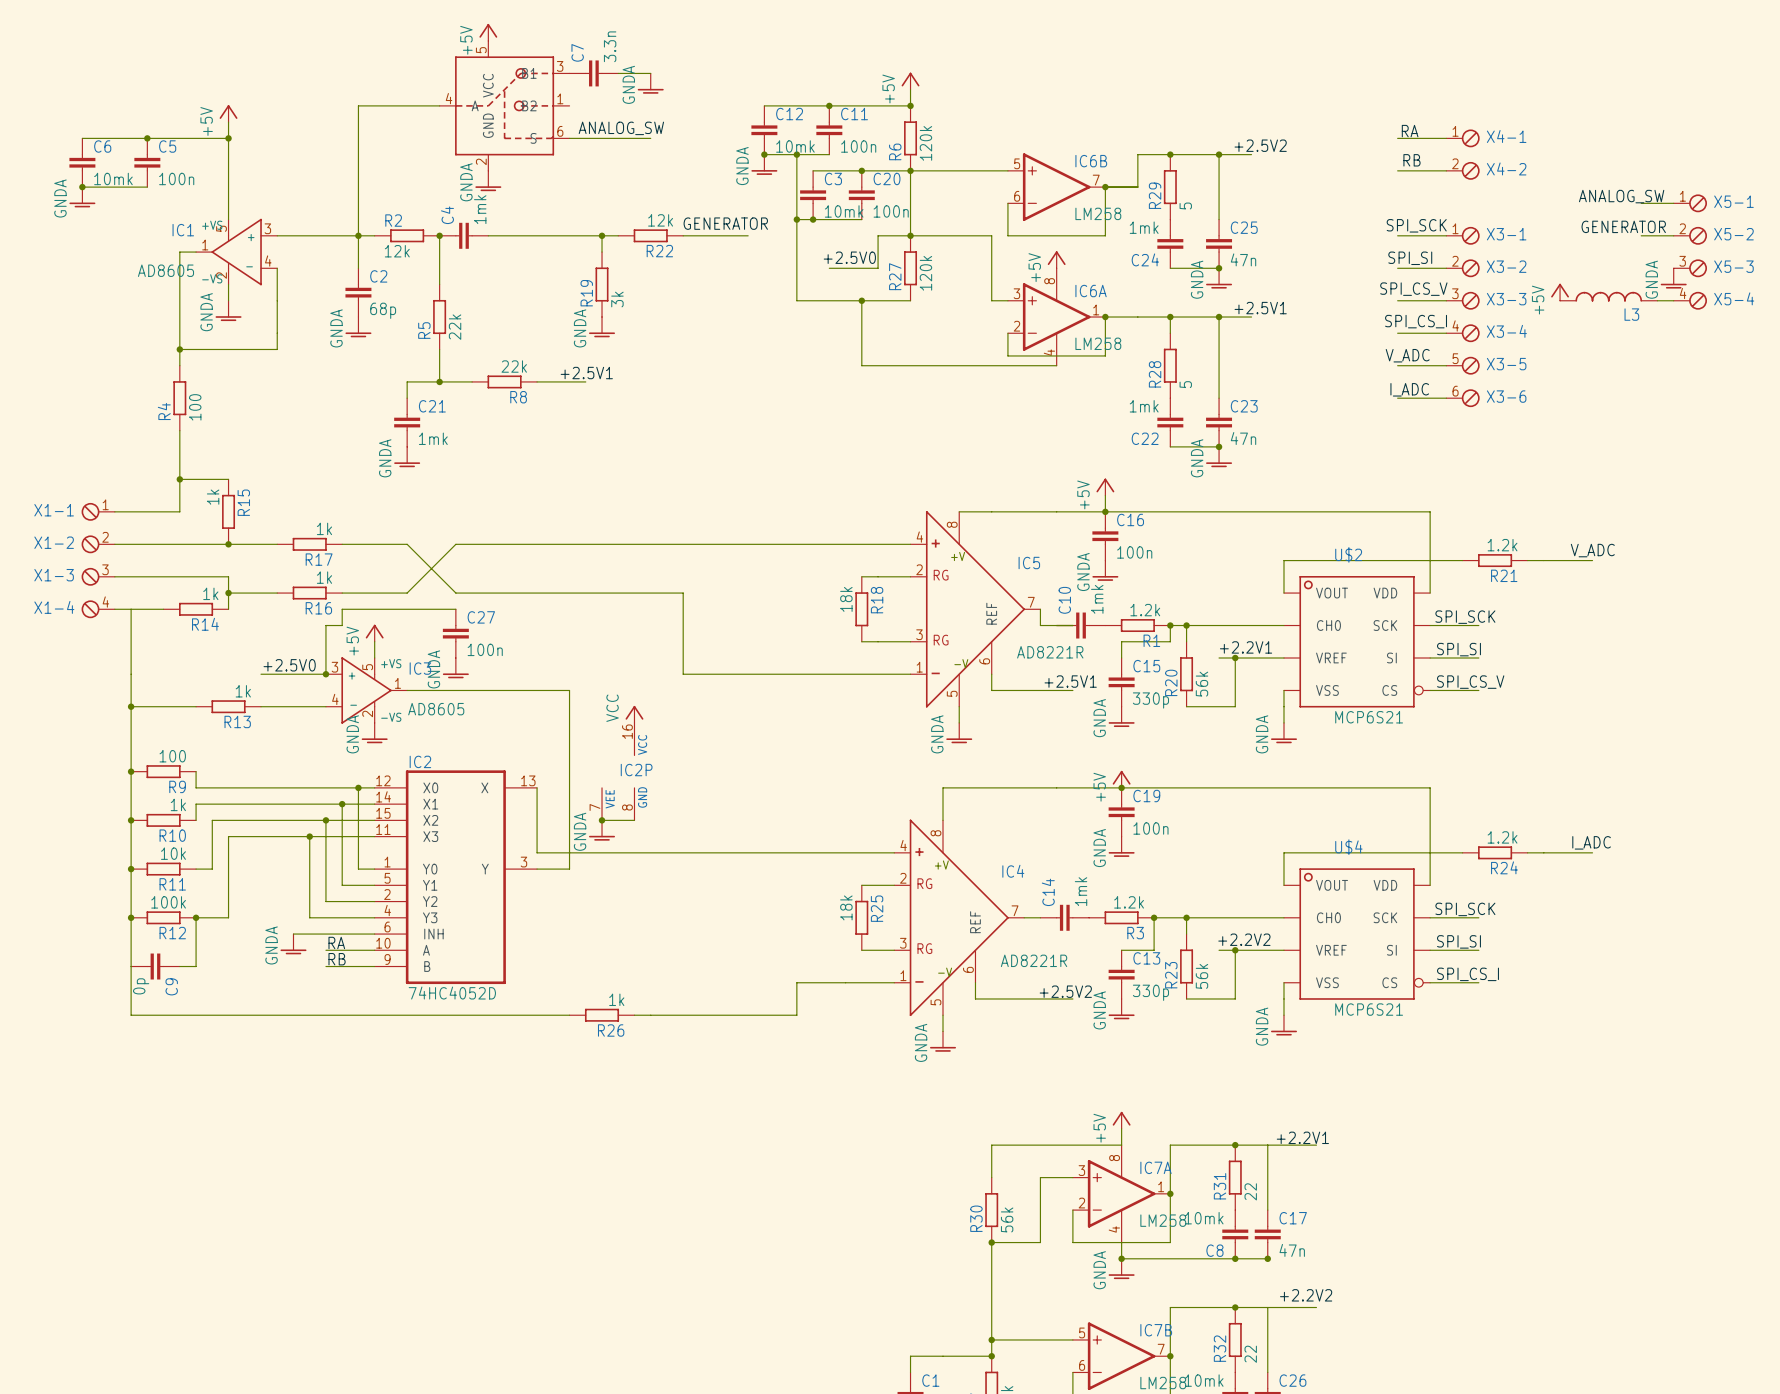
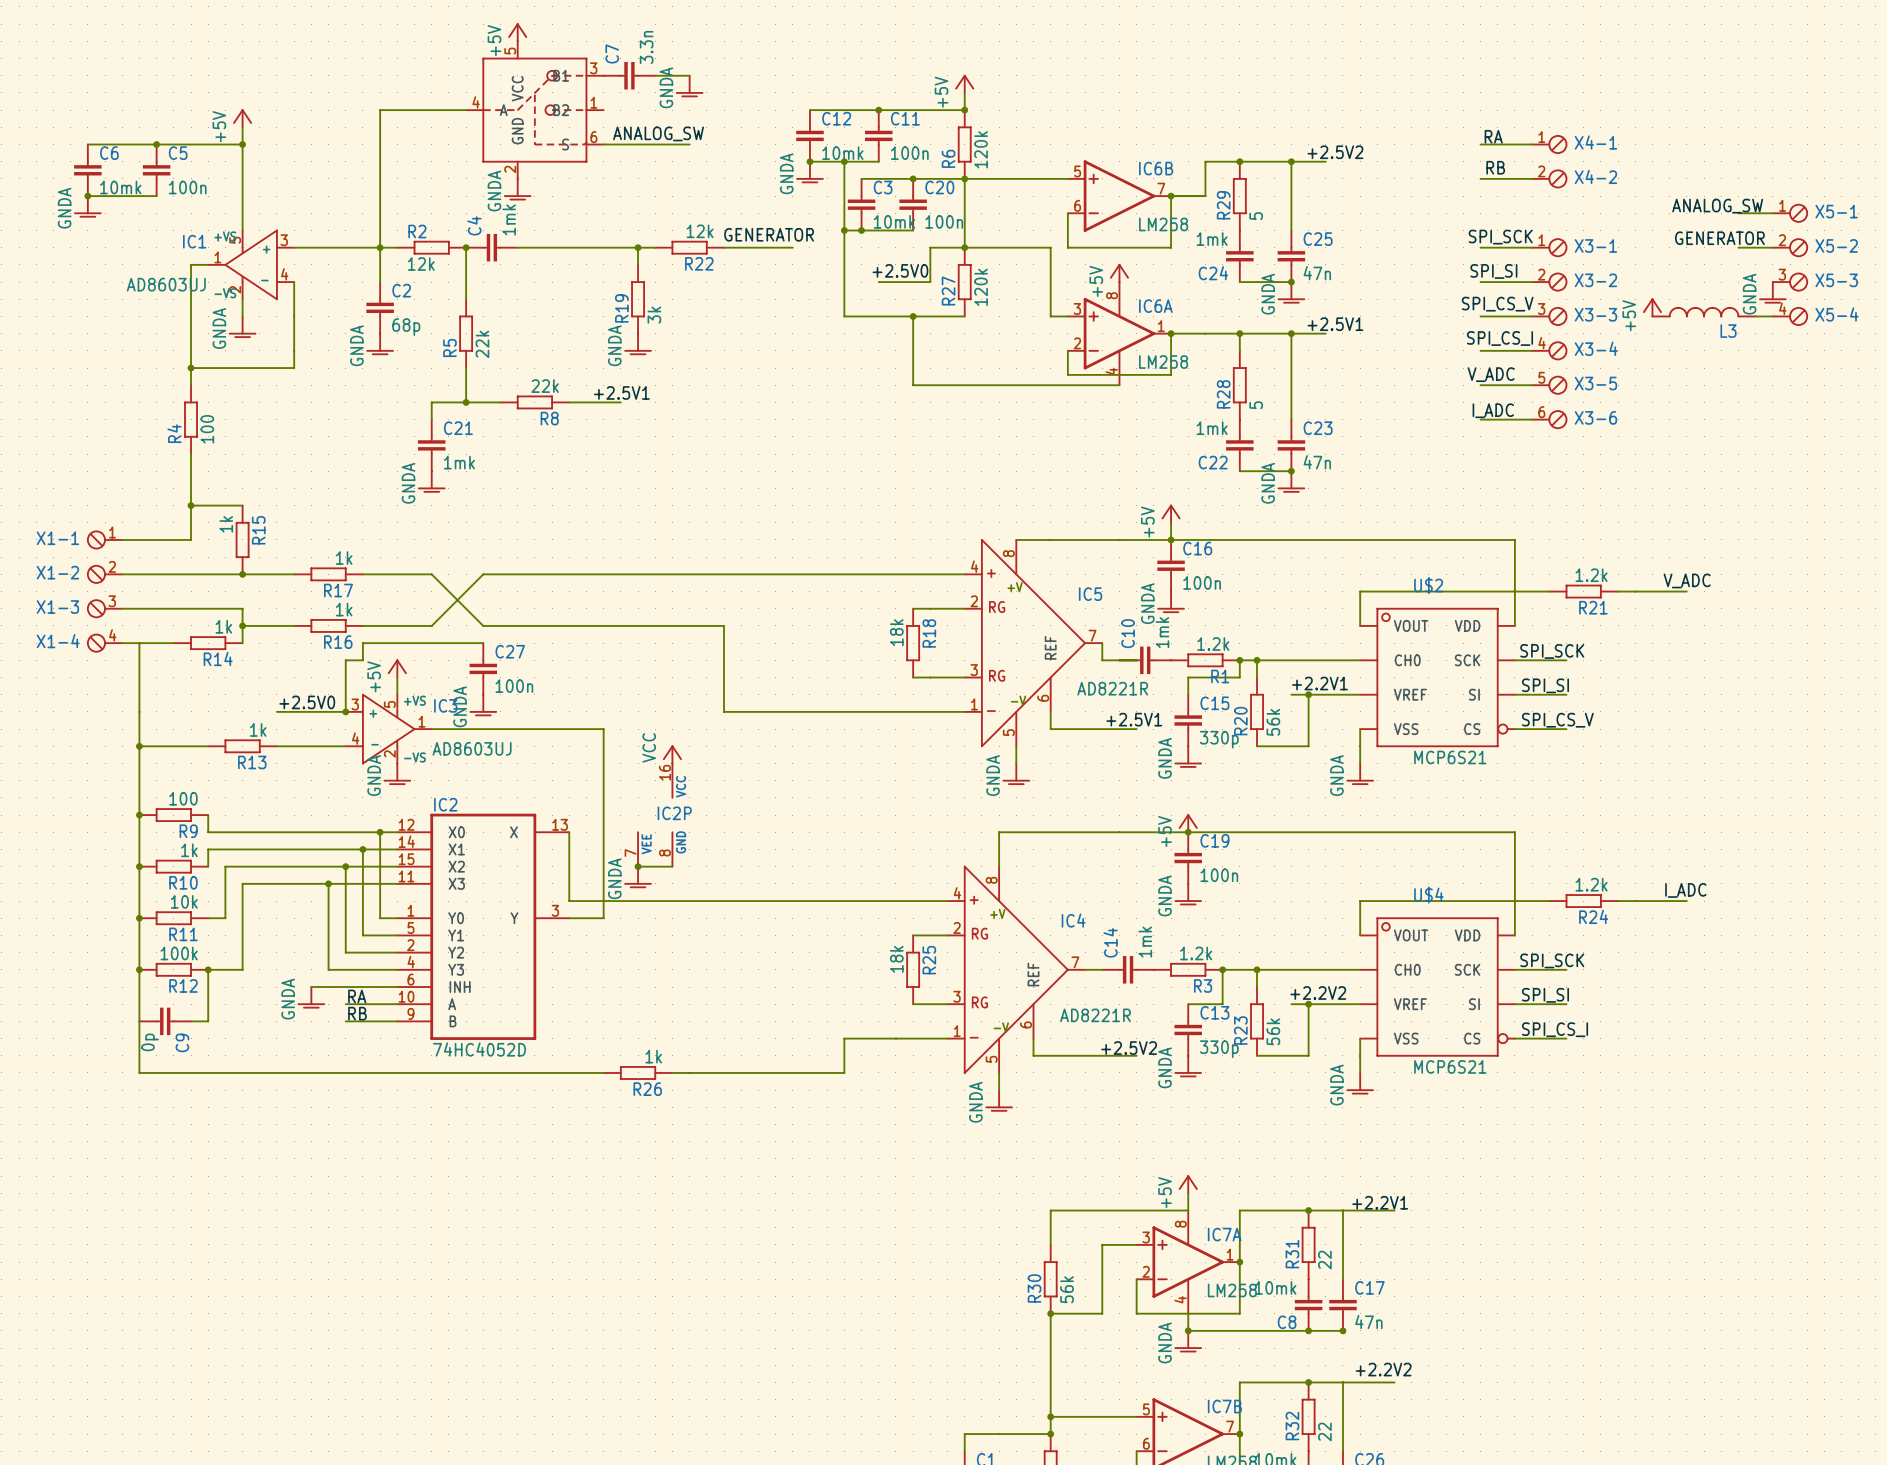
IC1 value: AD8605 (165, 270) -> AD8603UJ (166, 284)
IC3 value: AD8605 (436, 709) -> AD8603UJ (472, 748)

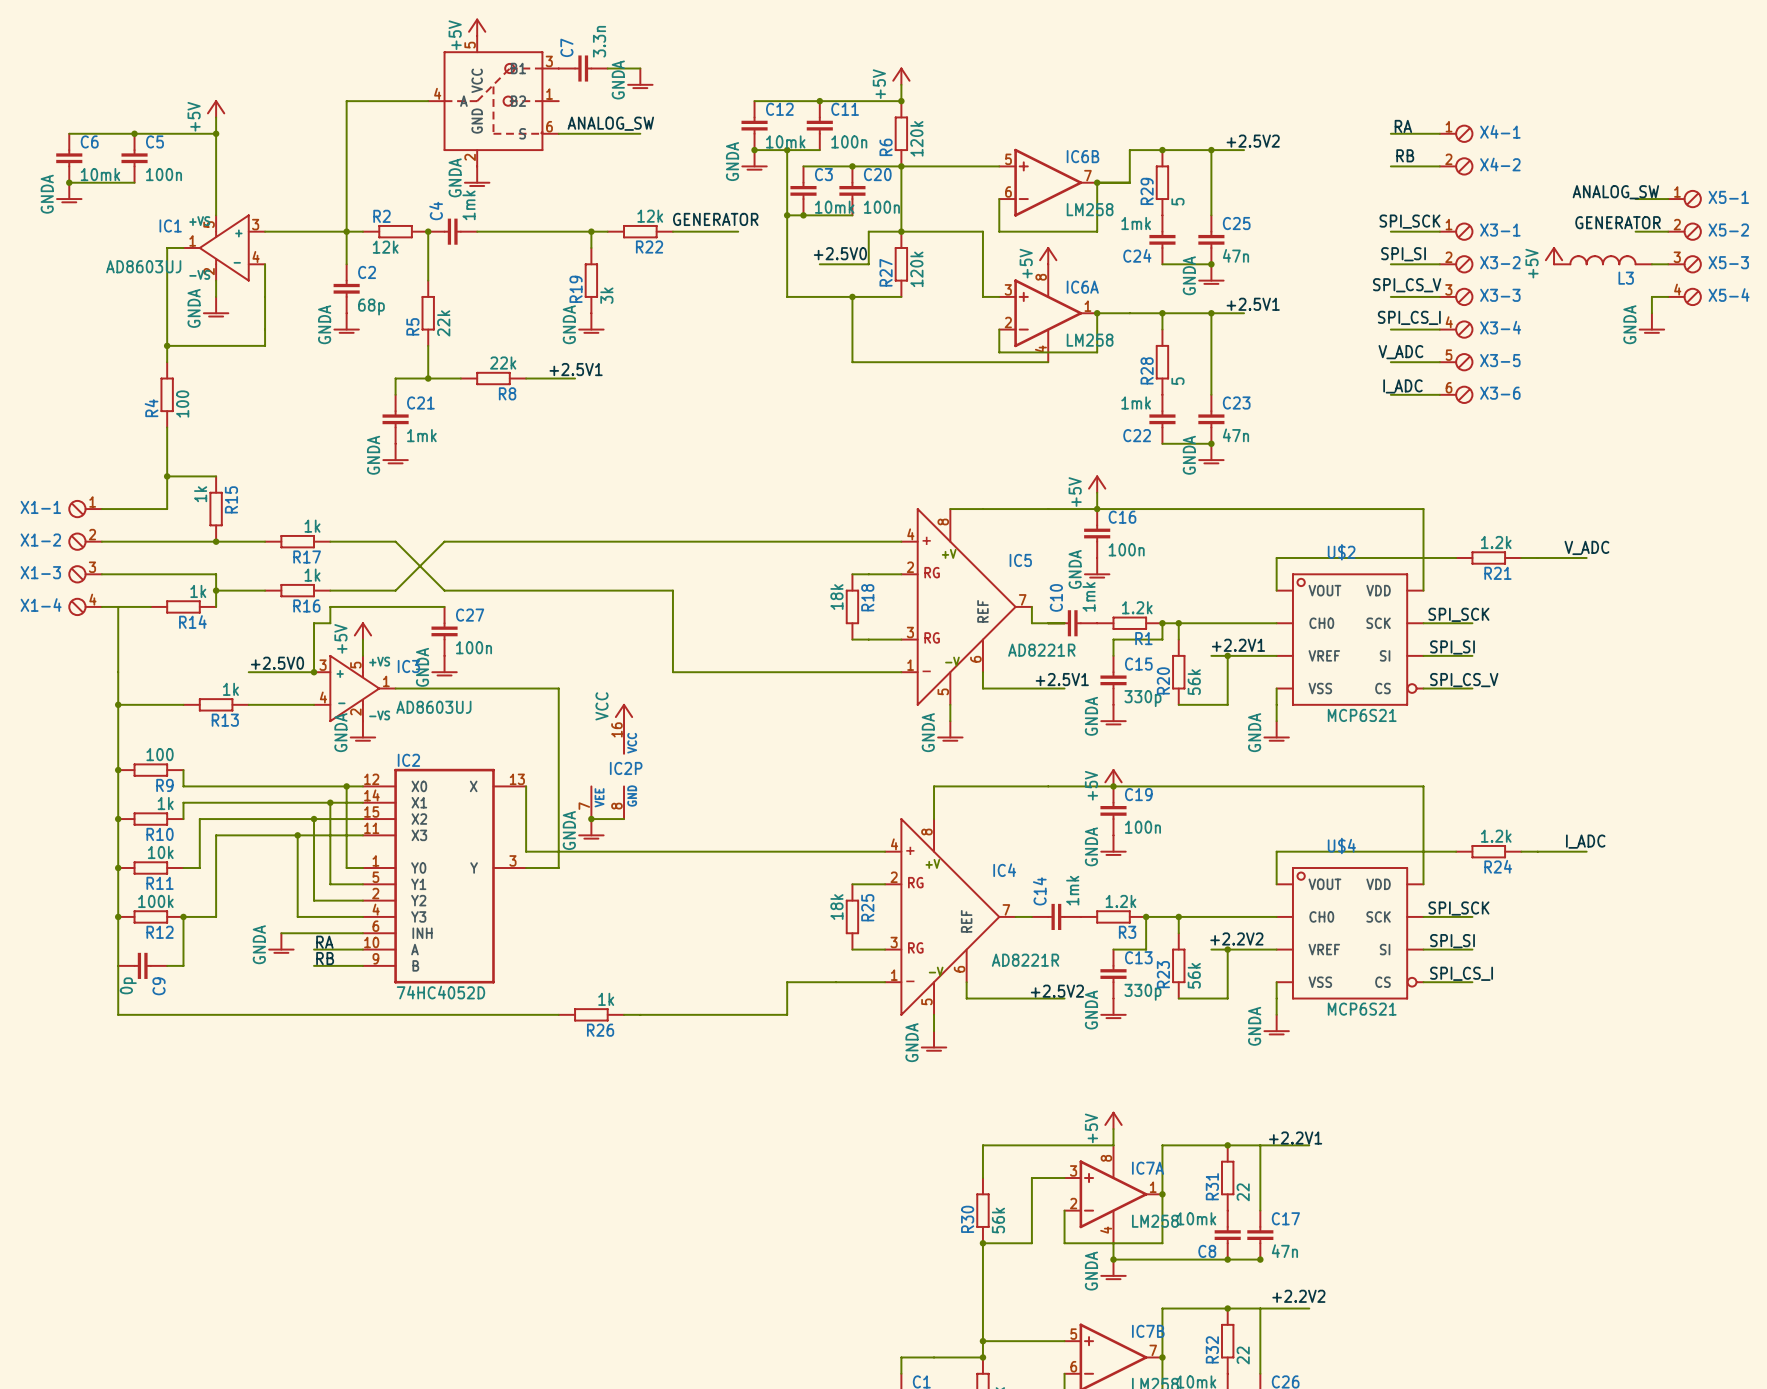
wire: none -> (1651, 264) (1668, 264)
power symbol position: GNDA (1772, 292) -> GNDA (1651, 323)
power symbol position: +5V (1652, 307) -> +5V (1554, 255)
L3 position: (1704, 312) -> (1602, 260)
wire: none -> (1651, 296) (1651, 313)

